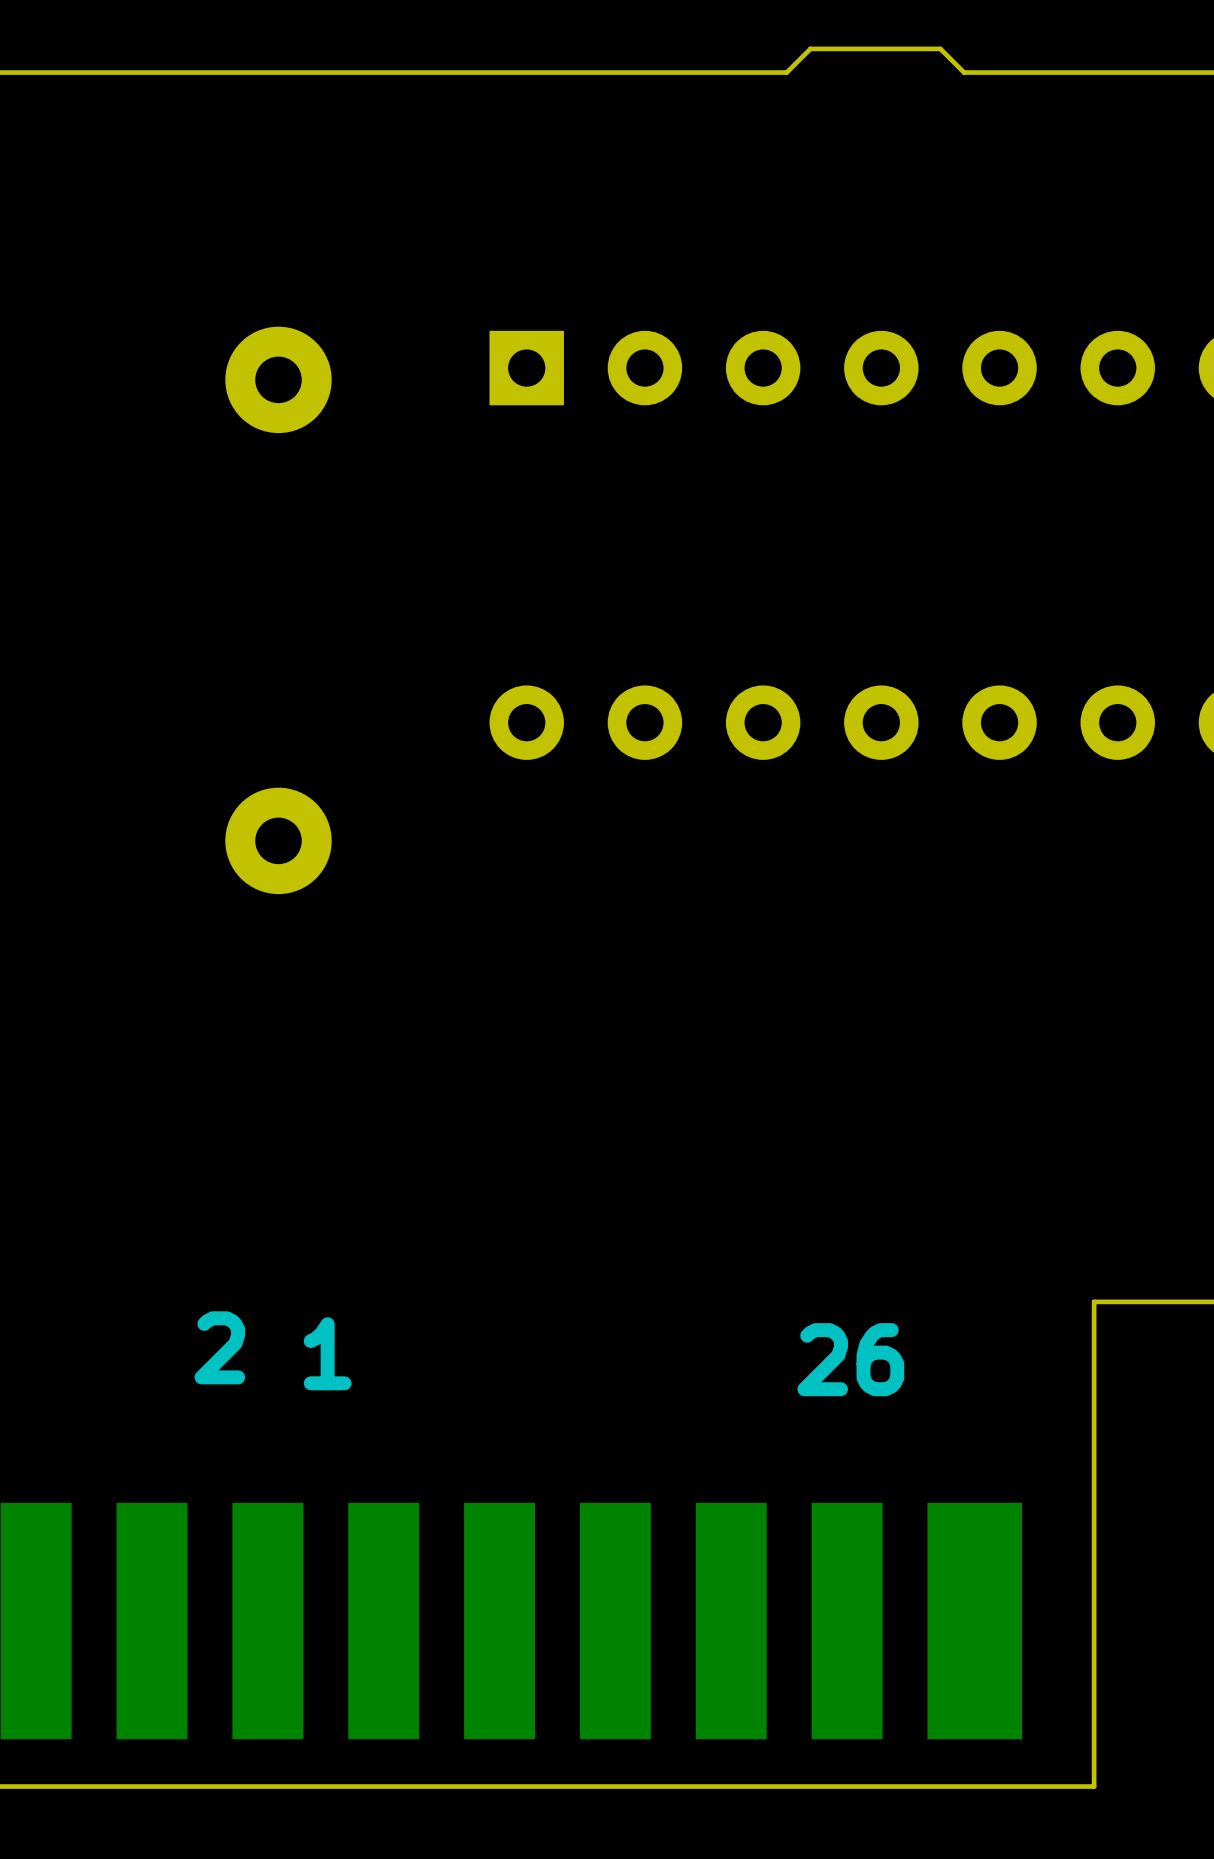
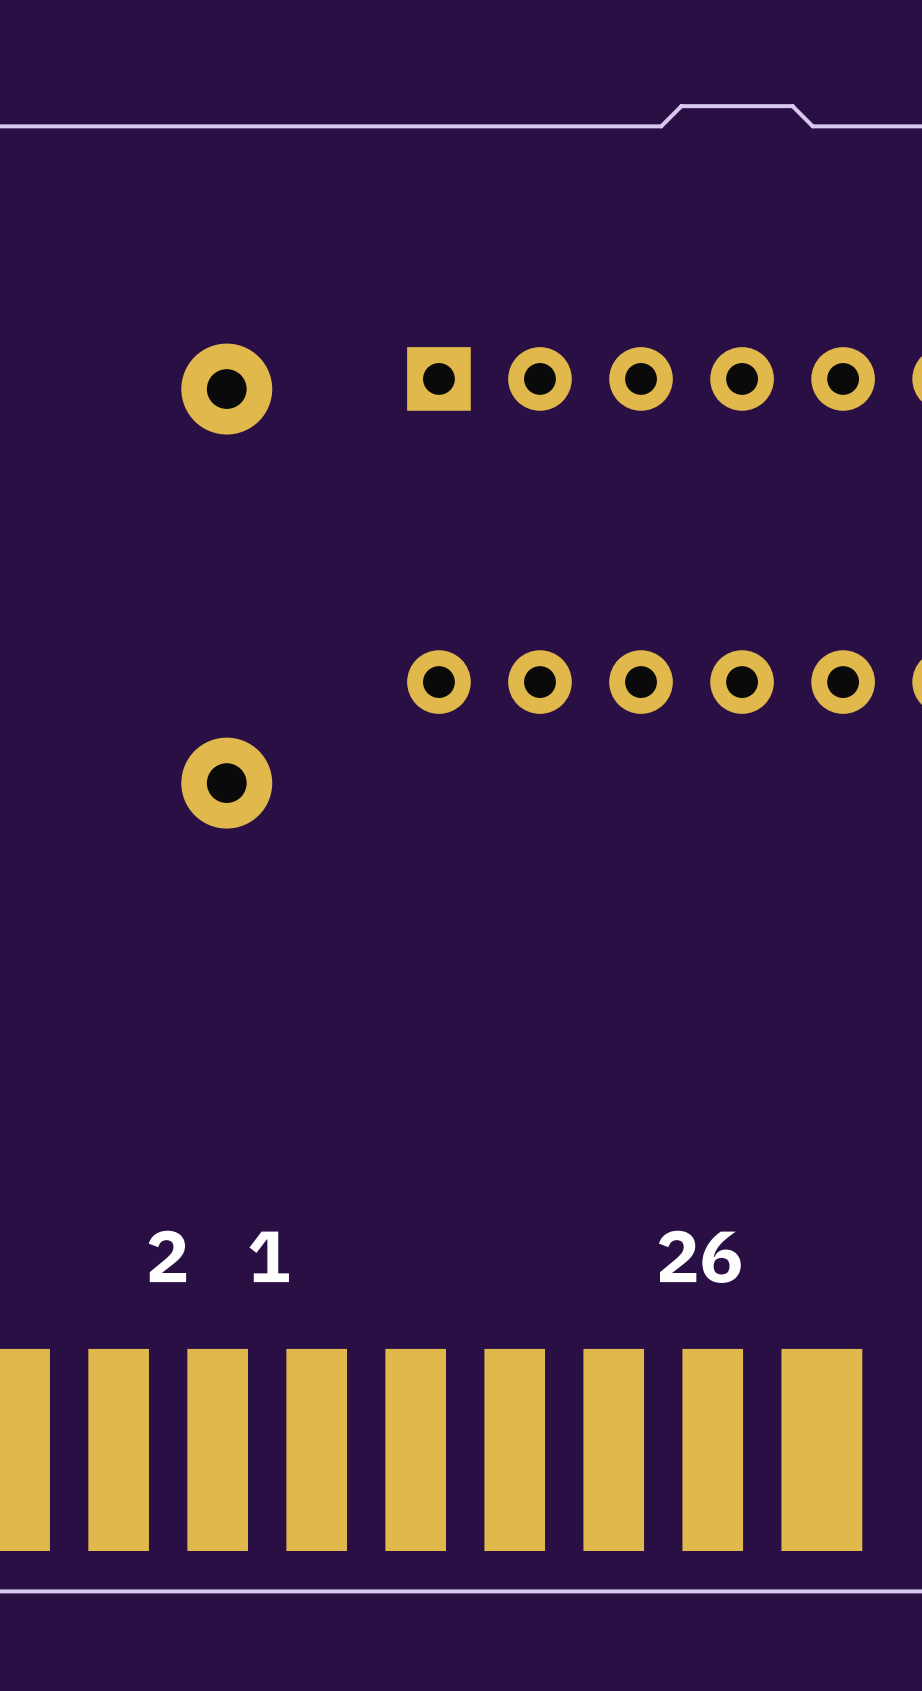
text position: 2 (219, 1347) -> 2 (167, 1256)
text position: 1 (327, 1353) -> 1 (269, 1256)
text position: 26 (850, 1359) -> 26 (699, 1256)

